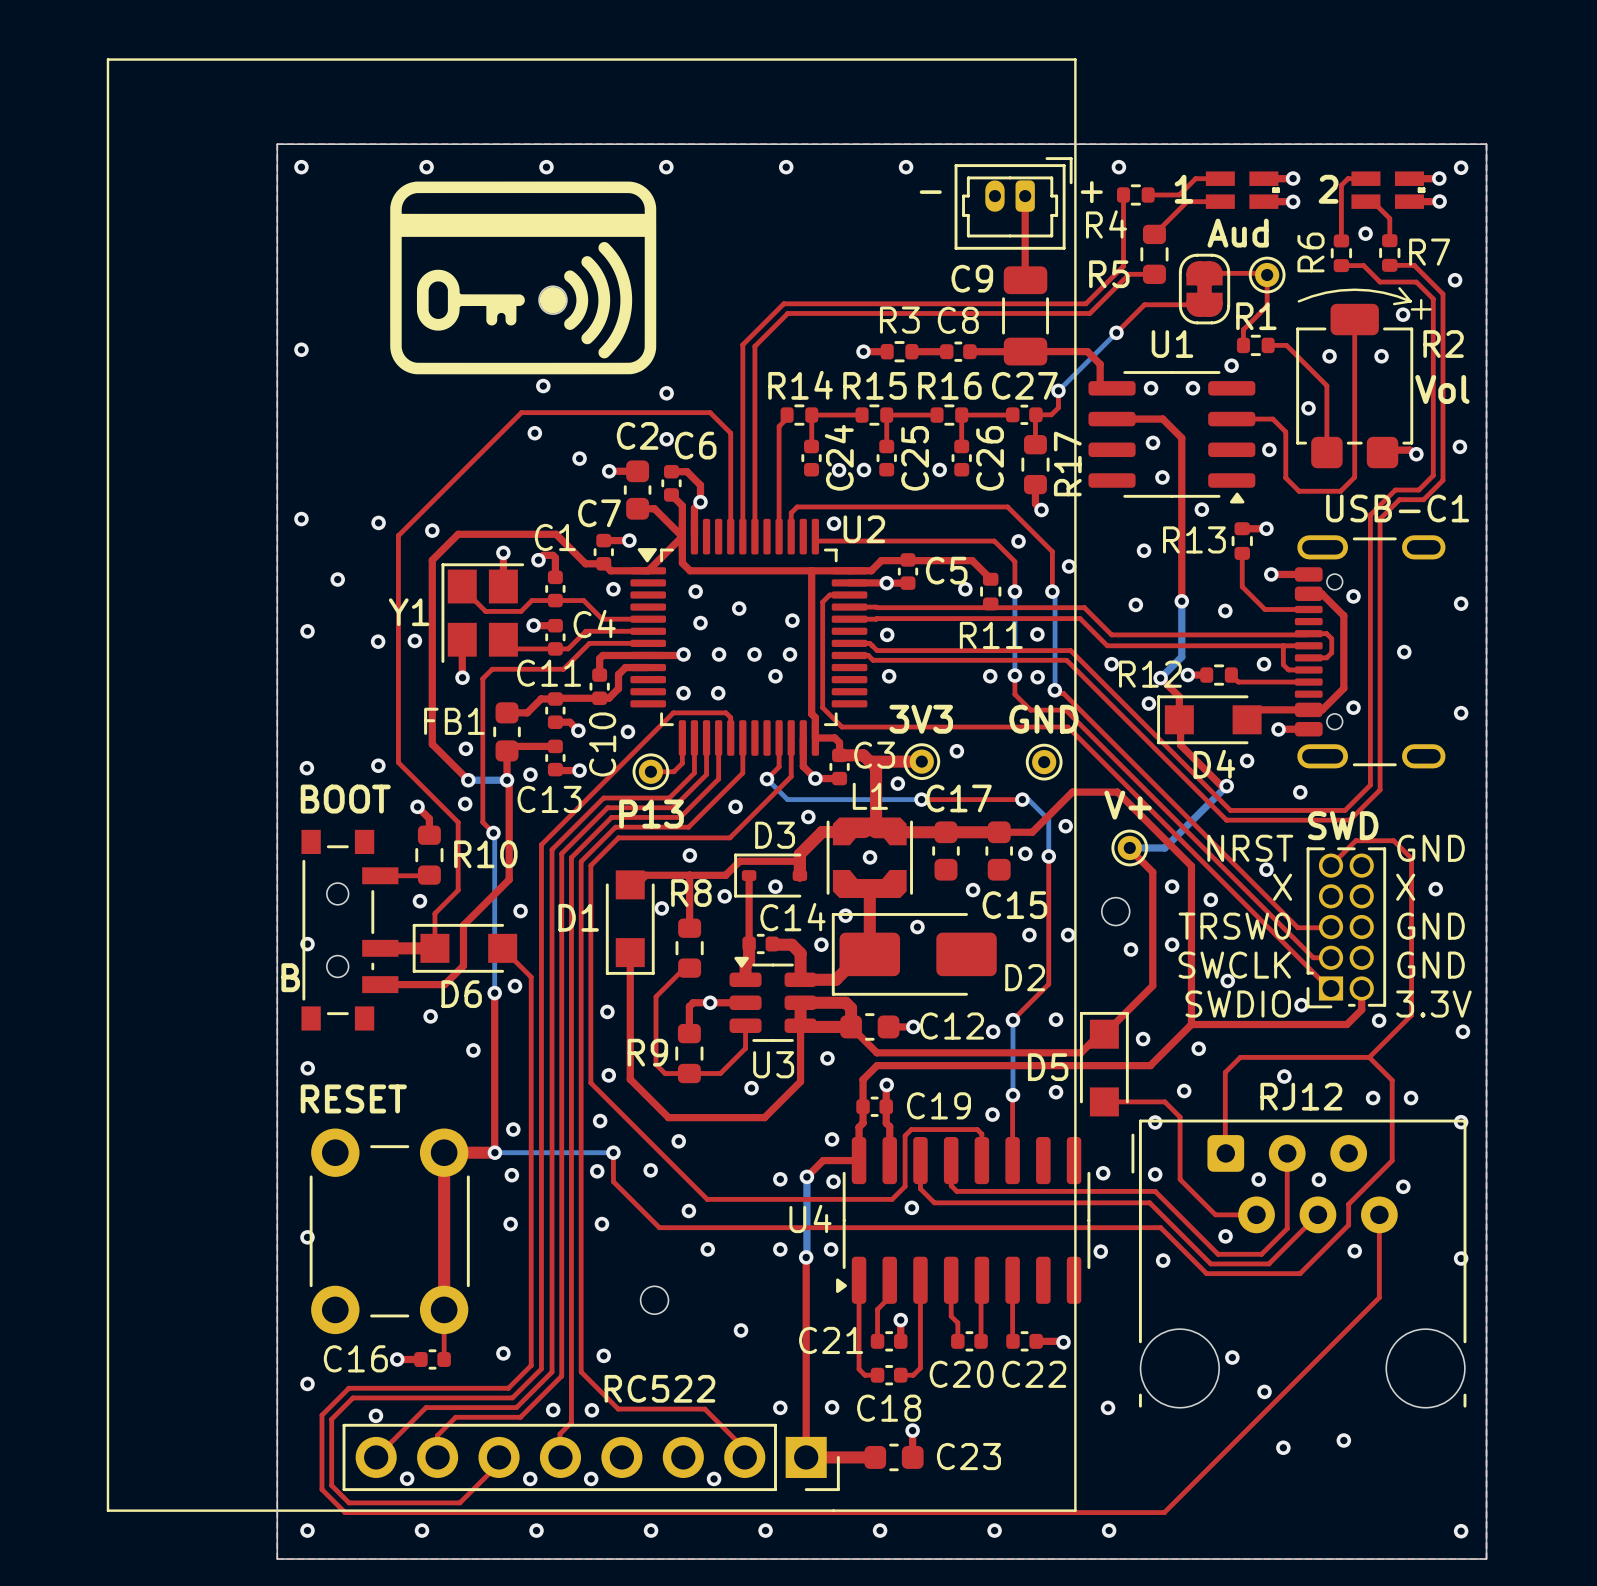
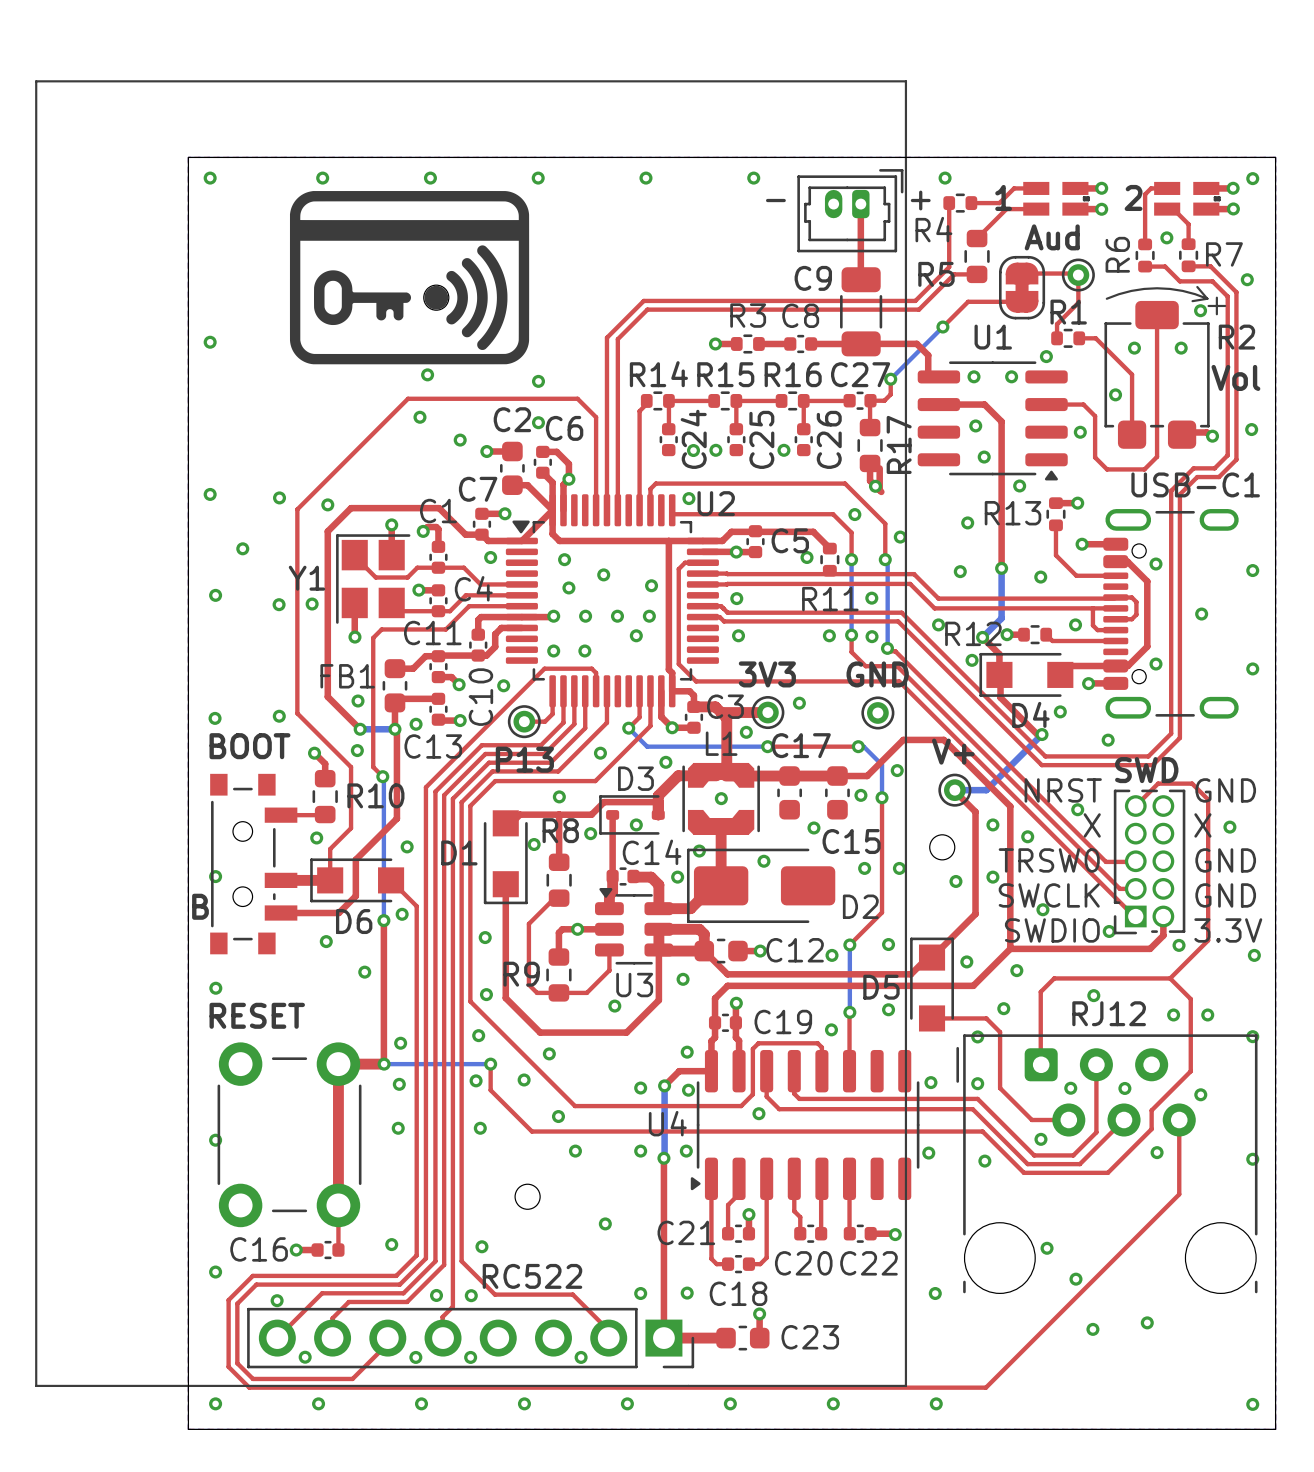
top track: none -> (879, 468) (879, 490) (881, 491)

